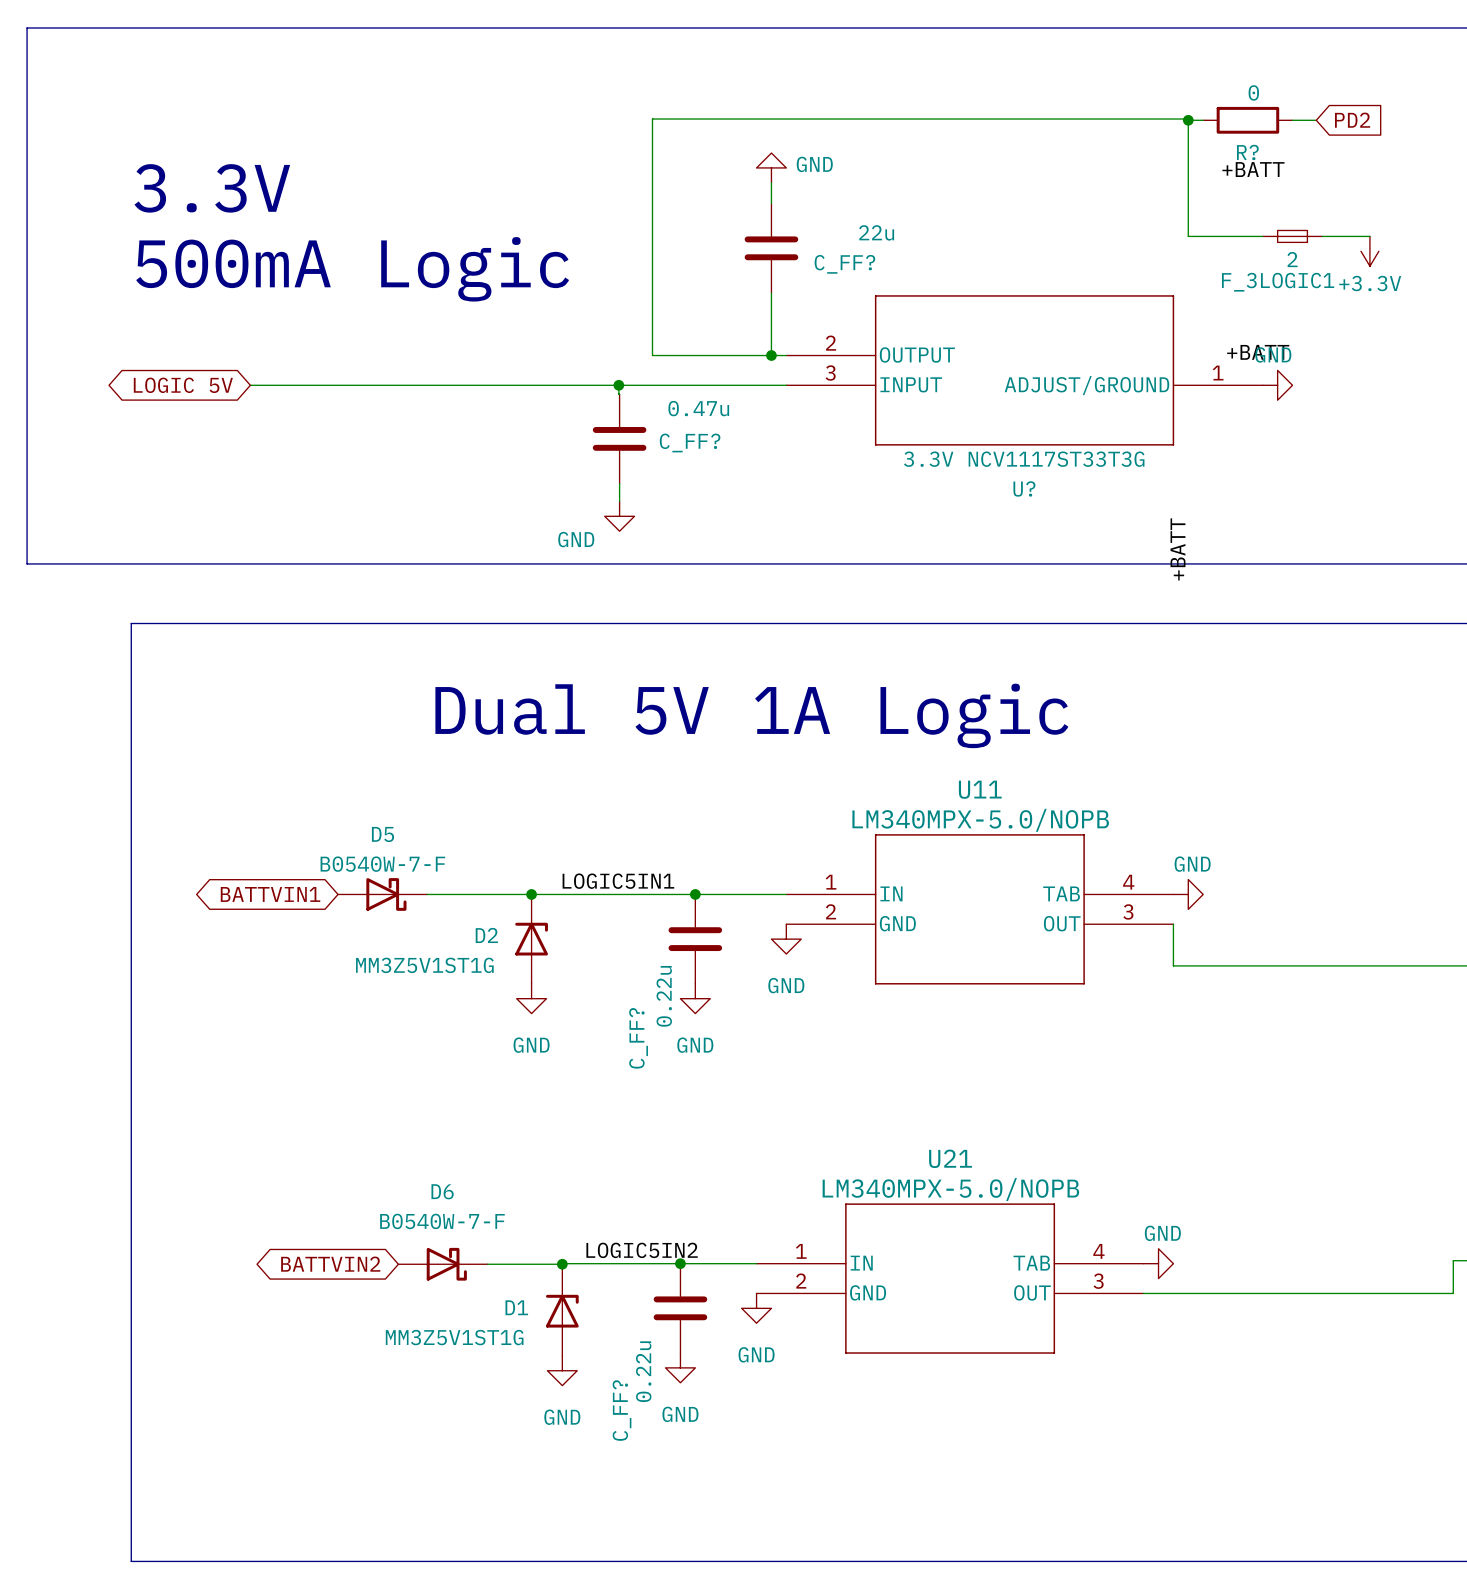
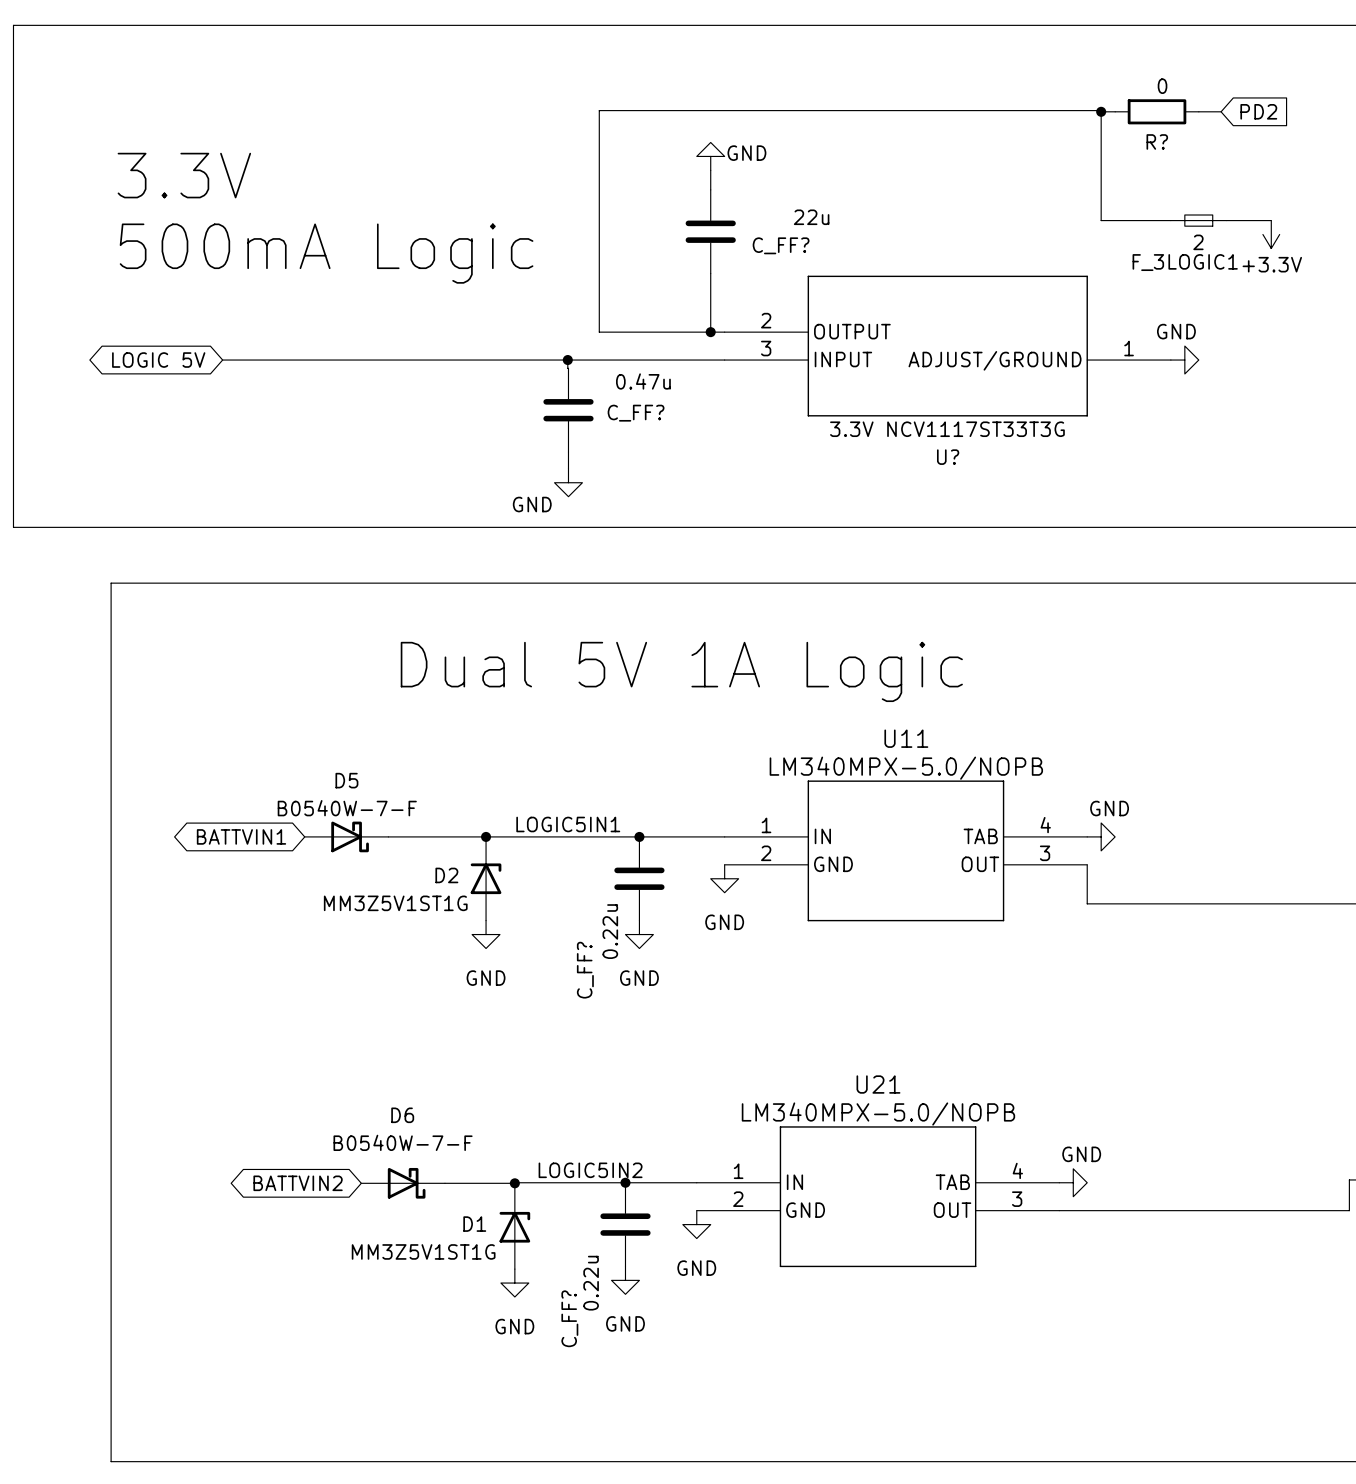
label: +BATT (1253, 169) -> none
label: +BATT (1258, 352) -> none
label: +BATT (1177, 549) -> none

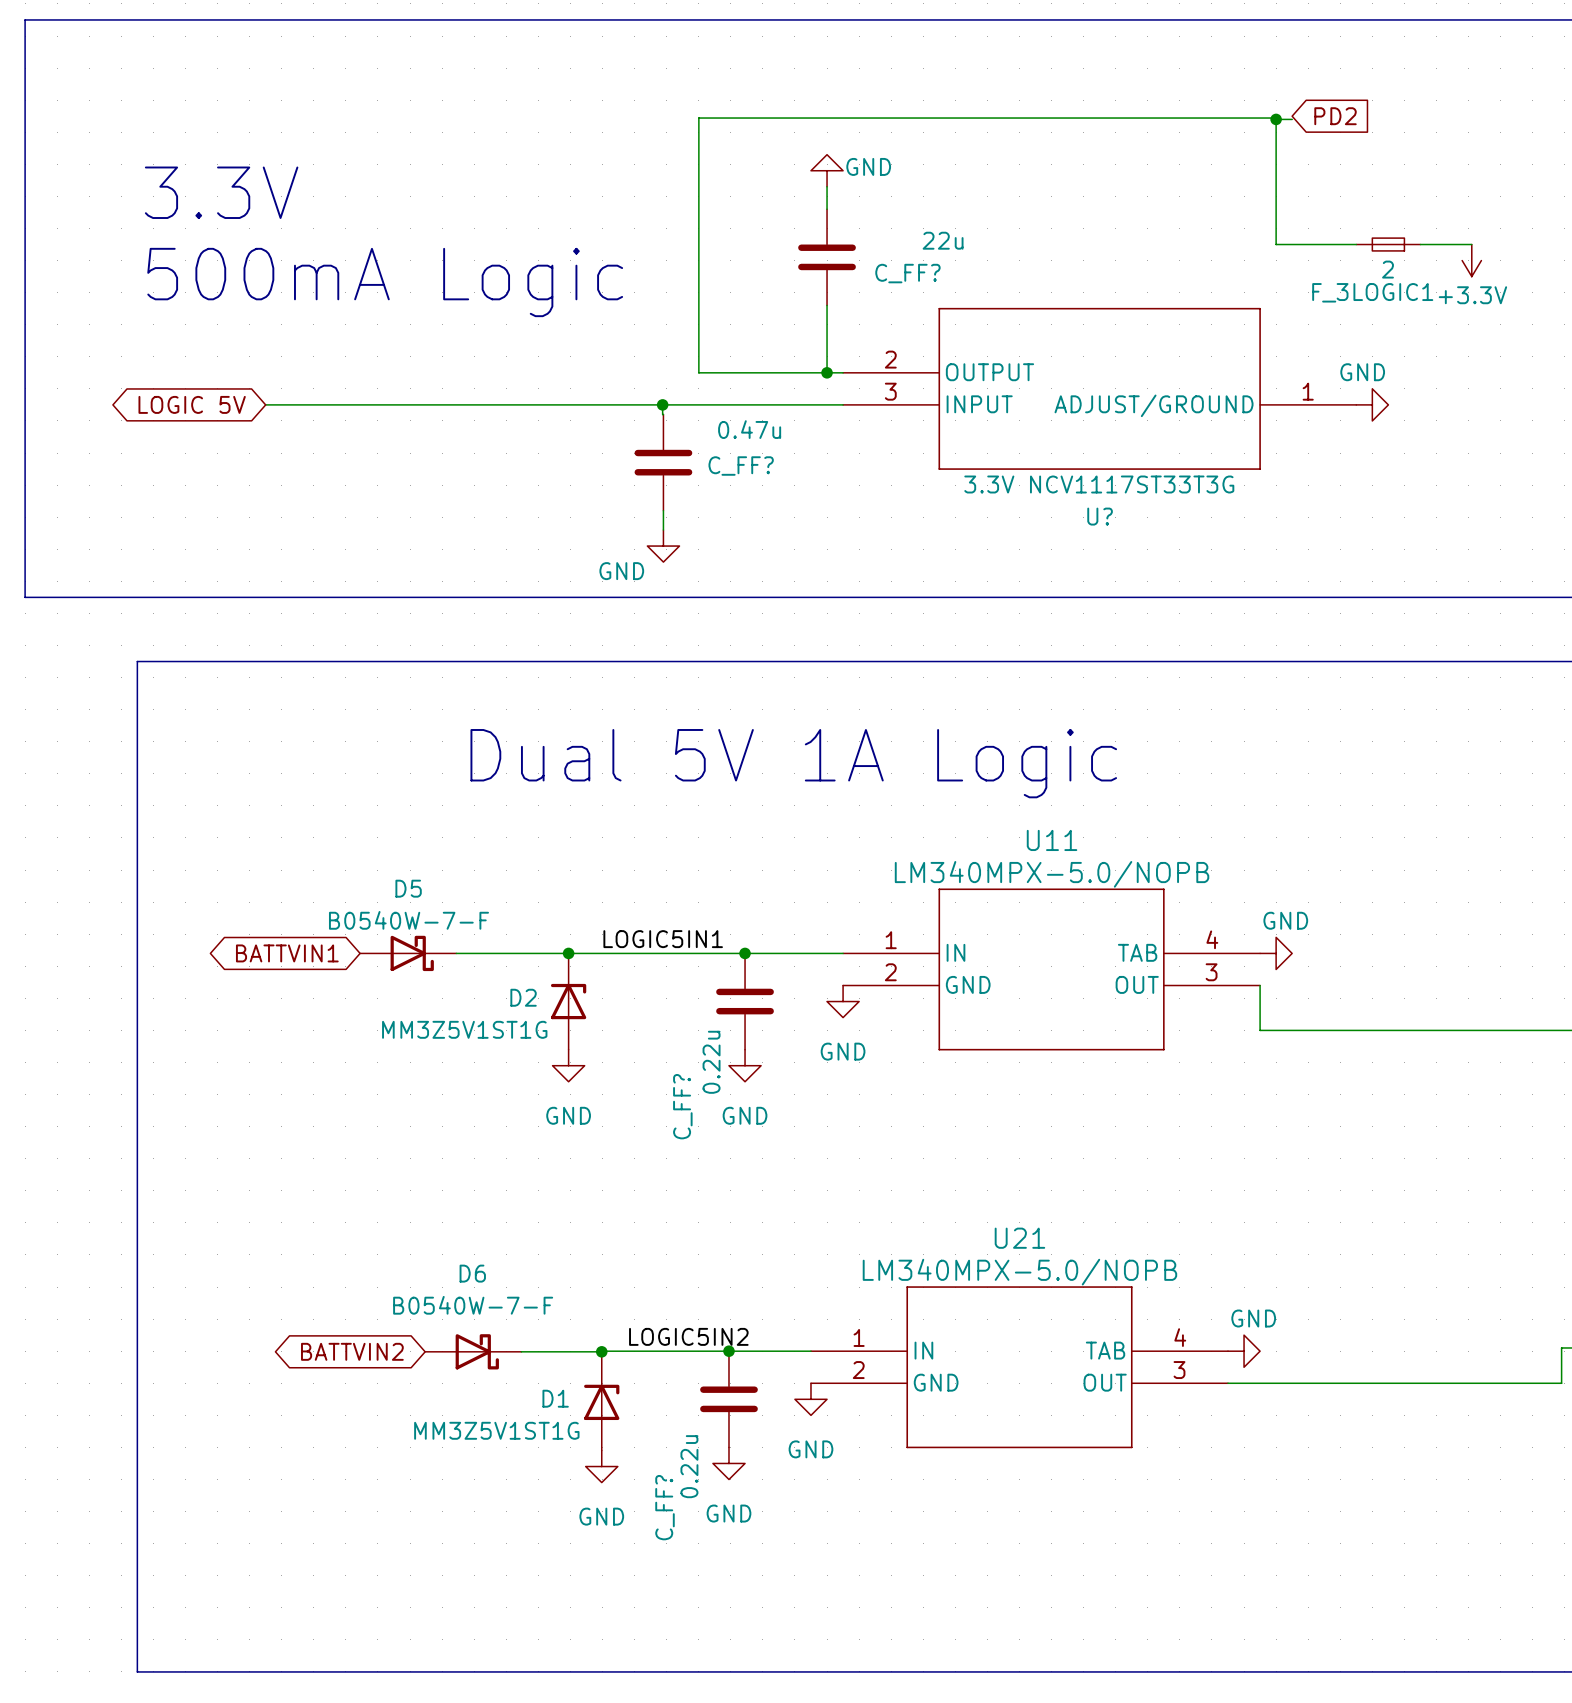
R?: 0 (1157, 111) -> none
wire: (1198, 111) (1221, 111) -> none
global label position: PD2 (1258, 111) -> PD2 (1335, 116)

